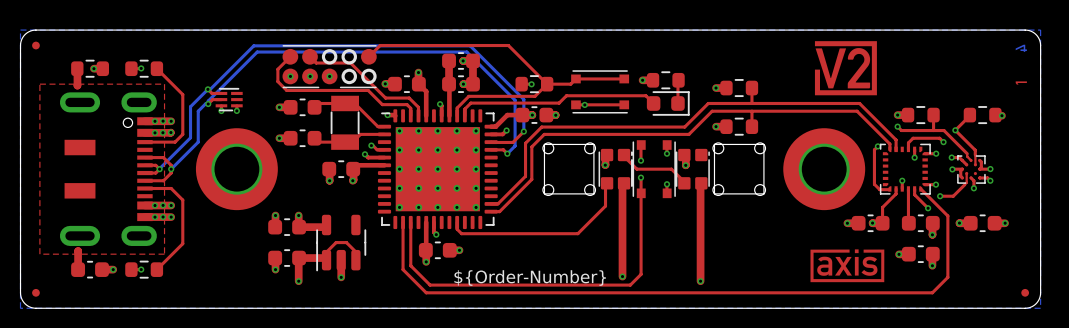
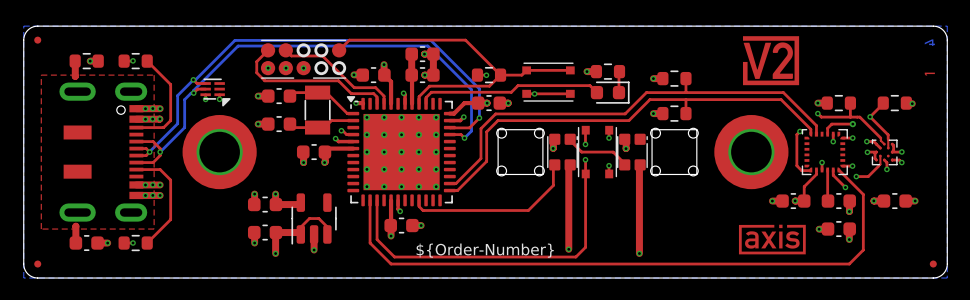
part footprint: [215, 87, 243, 112] -> [200, 78, 231, 107]
part footprint: [377, 109, 498, 230] -> [346, 96, 456, 207]
top track: (936, 138) (939, 138) (943, 142) -> none
via: none -> (852, 124)
via: (943, 142) -> none

